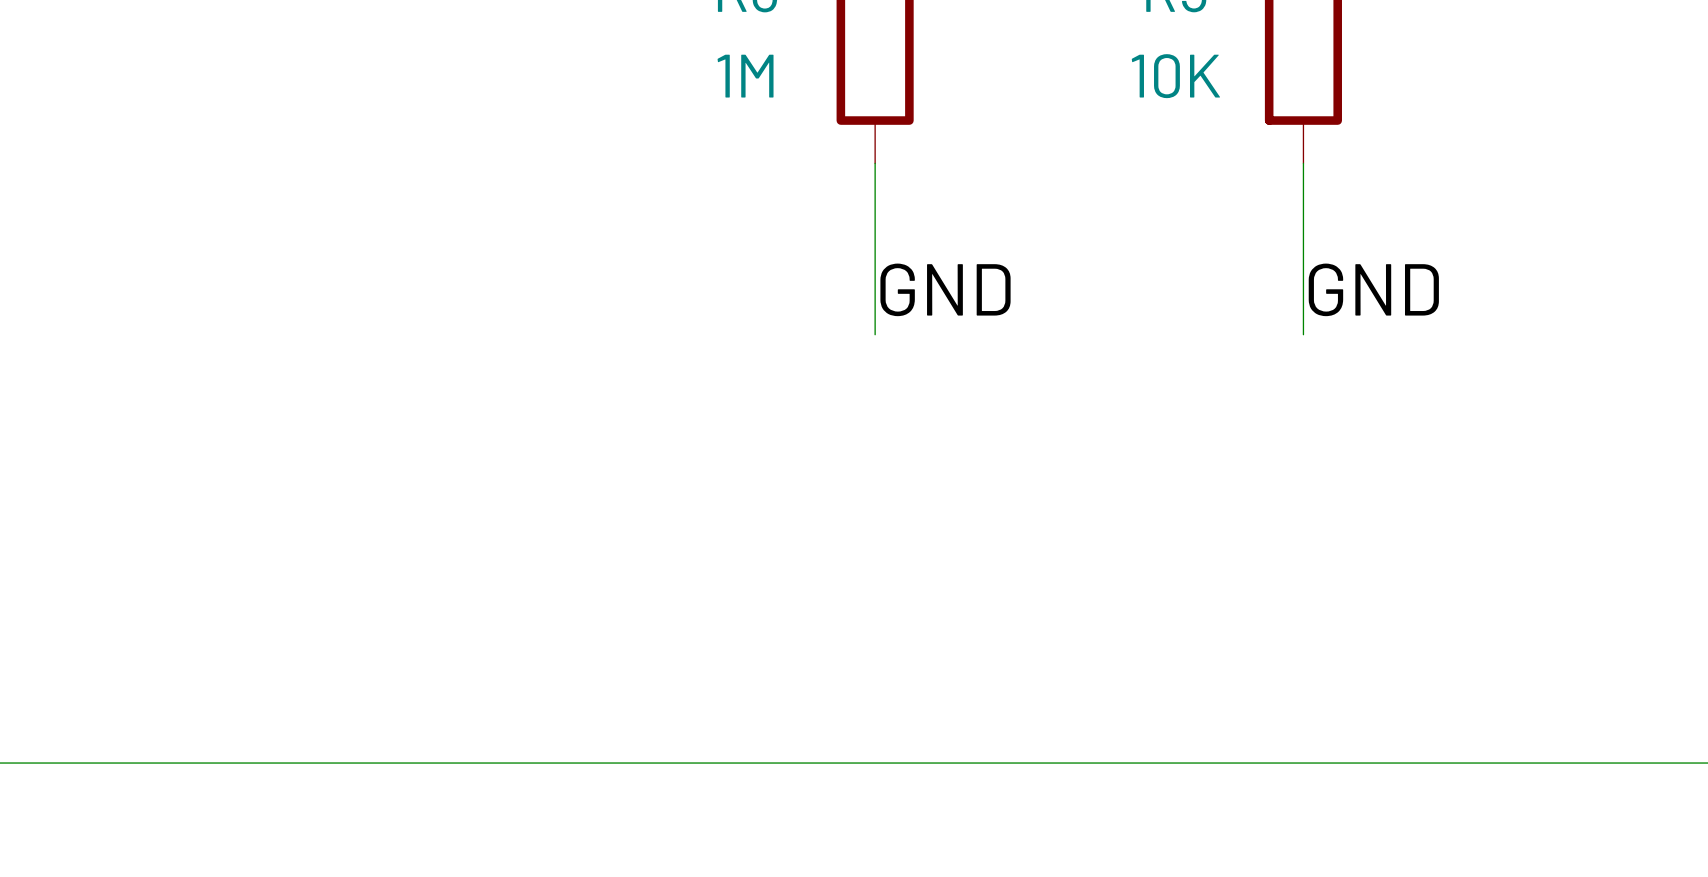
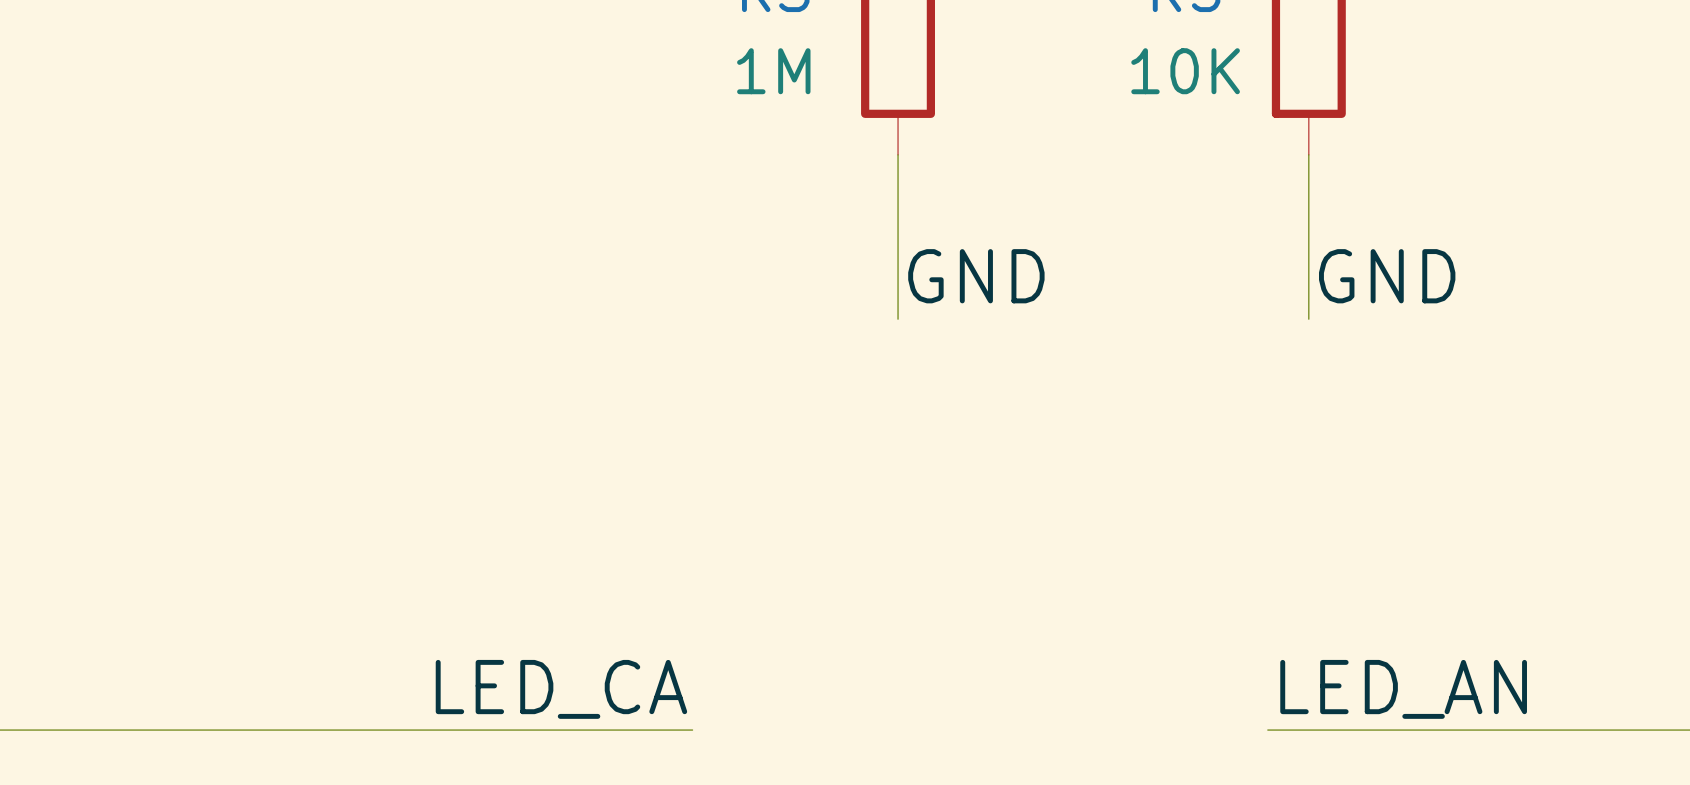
label: none -> LED_CA (561, 689)
label: none -> LED_AN (1403, 689)
wire: (660, 763) (1260, 763) -> none

